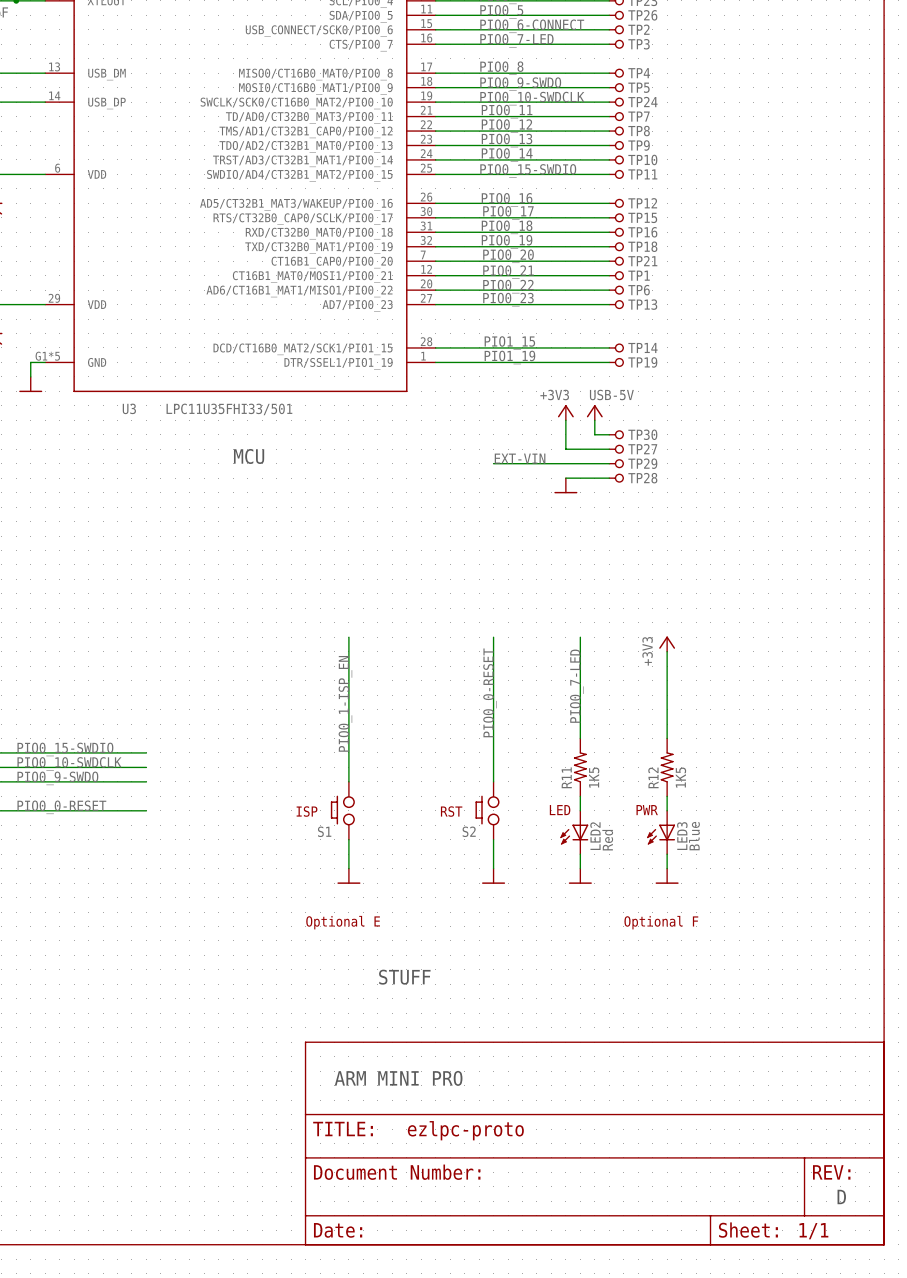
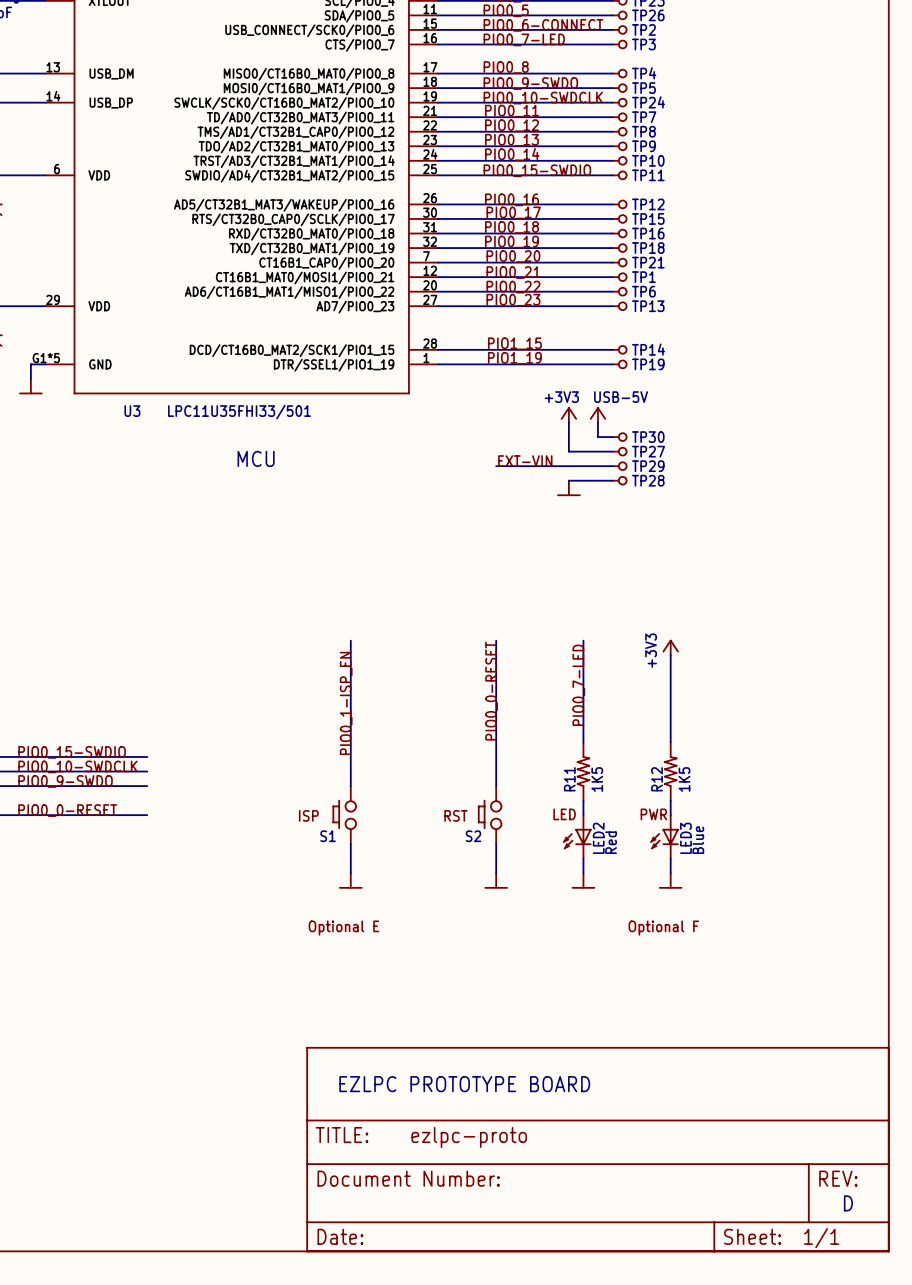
text: STUFF (404, 977) -> none
text: ARM MINI PRO (398, 1078) -> EZLPC PROTOTYPE BOARD (464, 1084)

